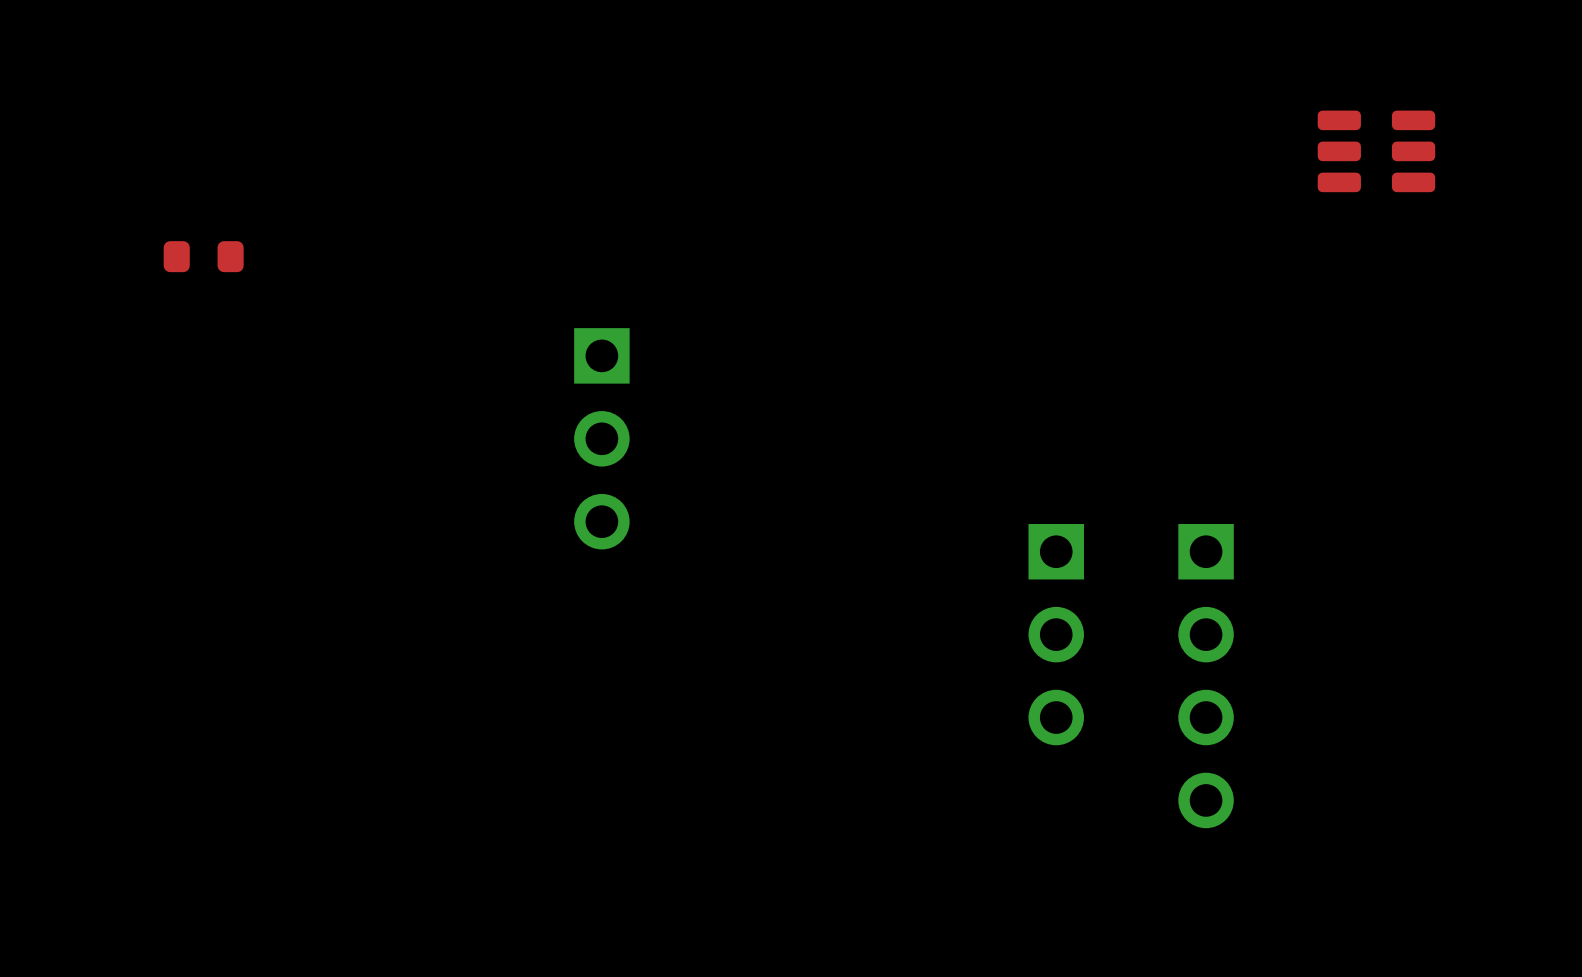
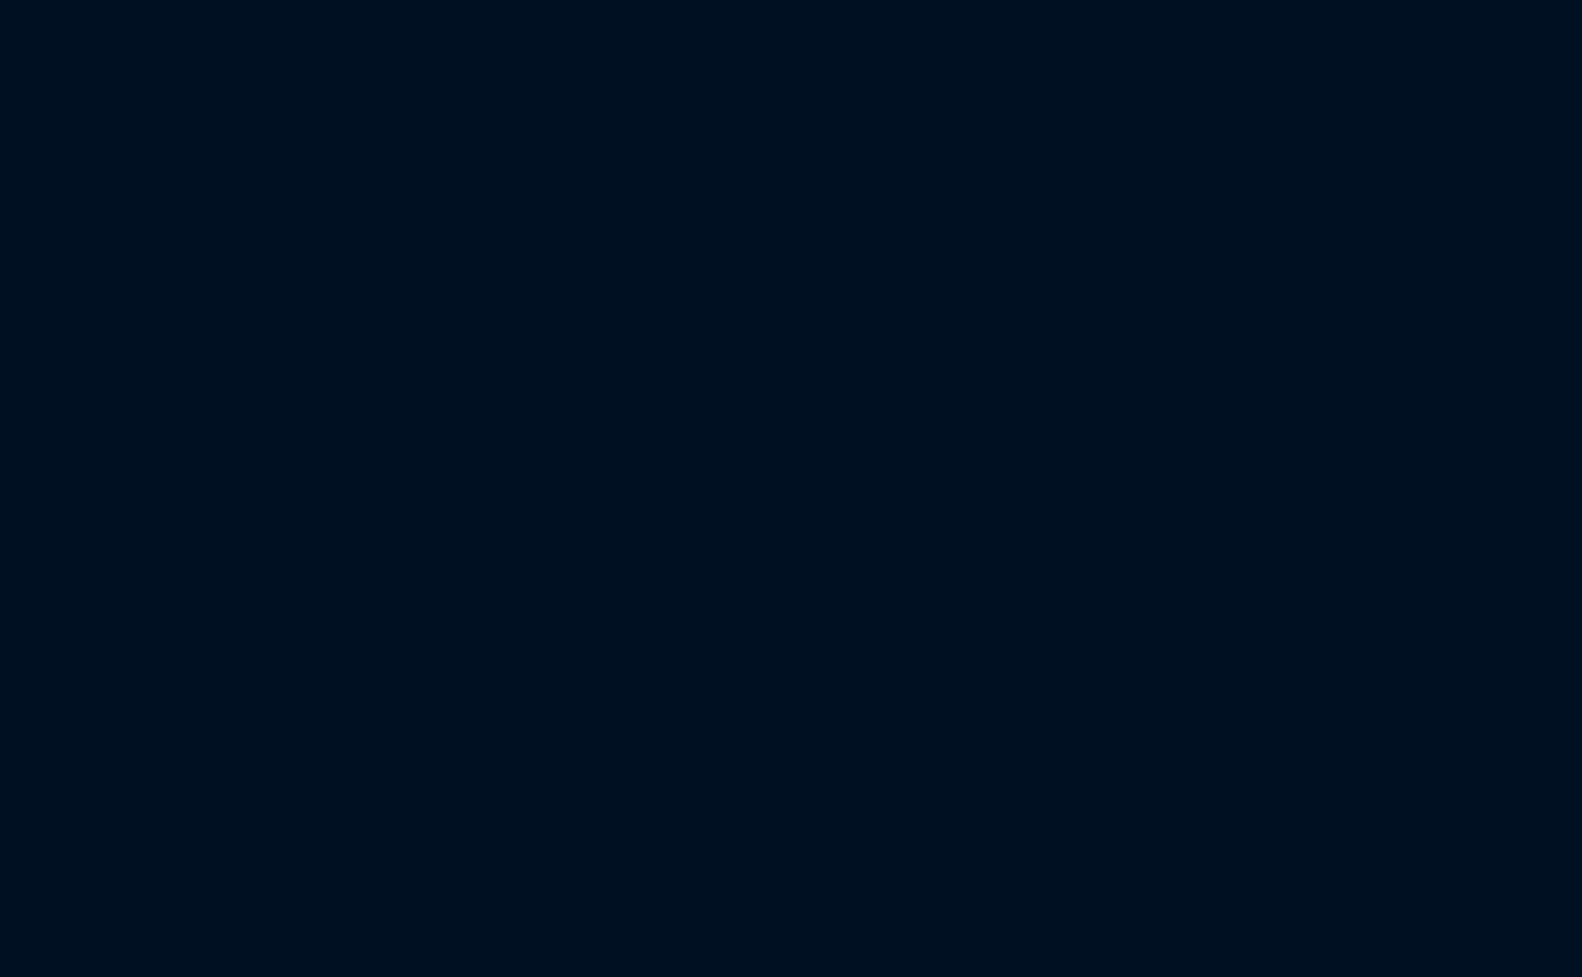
part: (1376, 151) -> none
part: (203, 256) -> none
part: (601, 438) -> none
part: (1056, 634) -> none
part: (1206, 676) -> none

